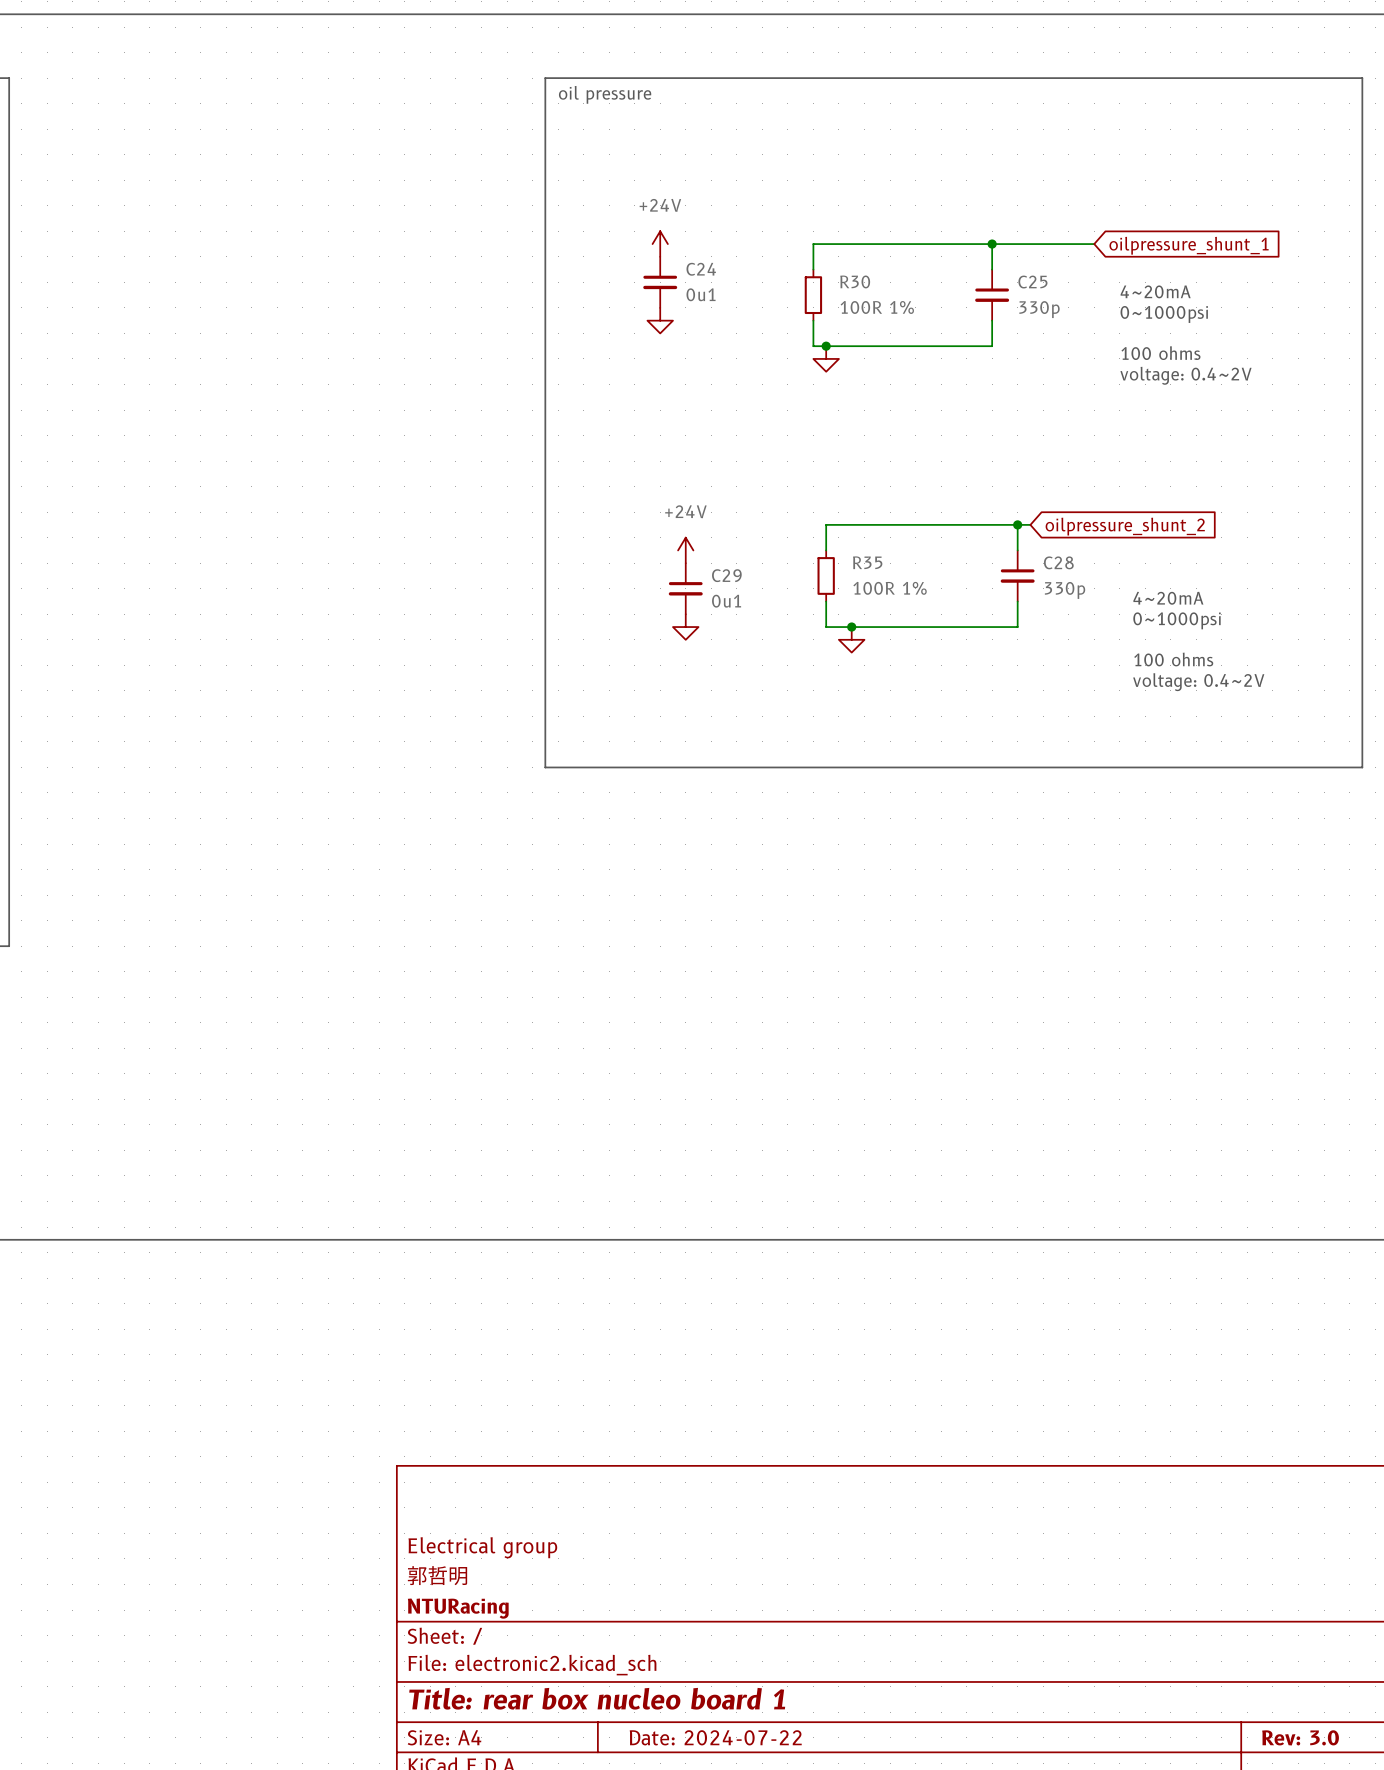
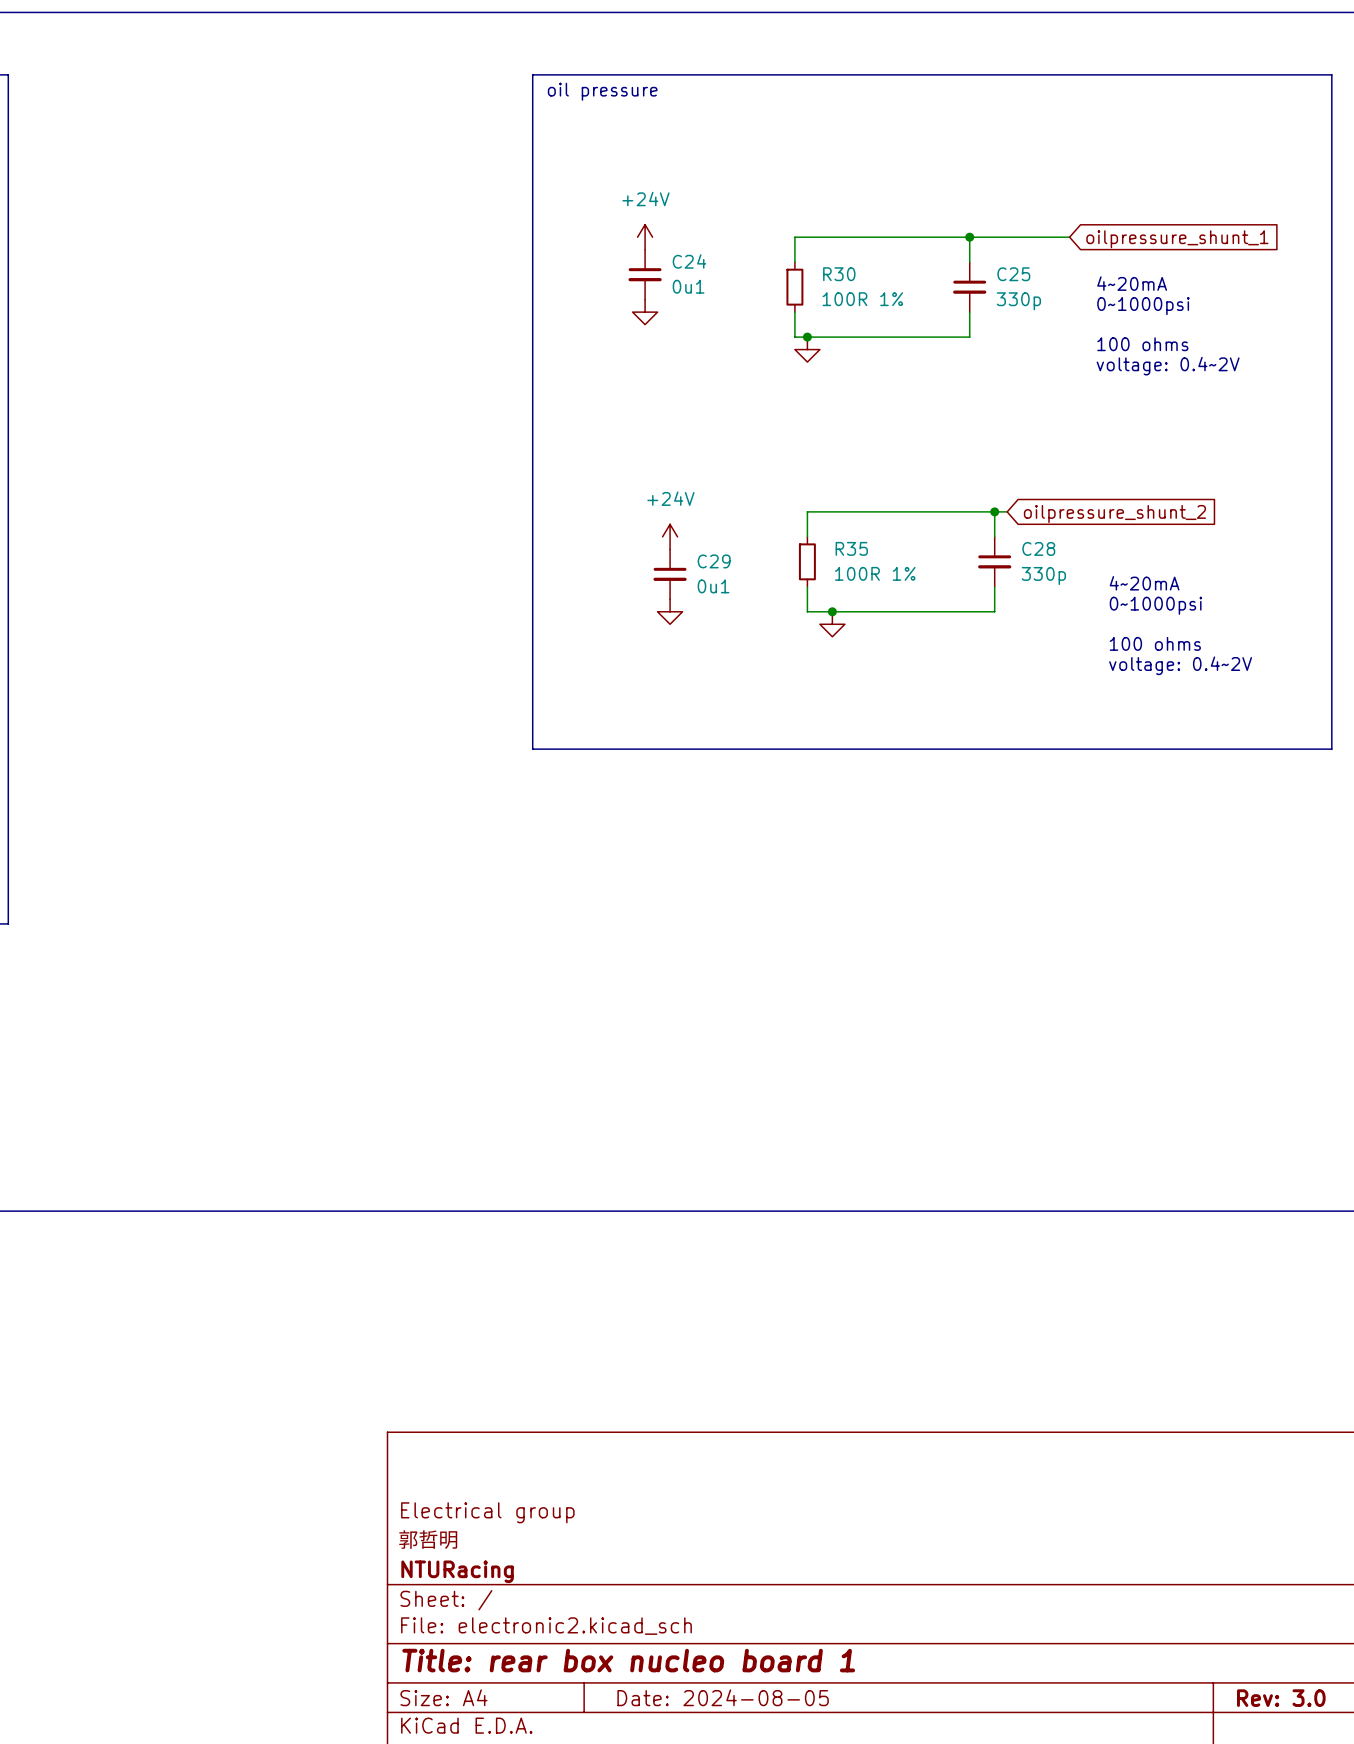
title block: Date: 2024-07-22 (715, 1737) -> Date: 2024-08-05 (723, 1697)

